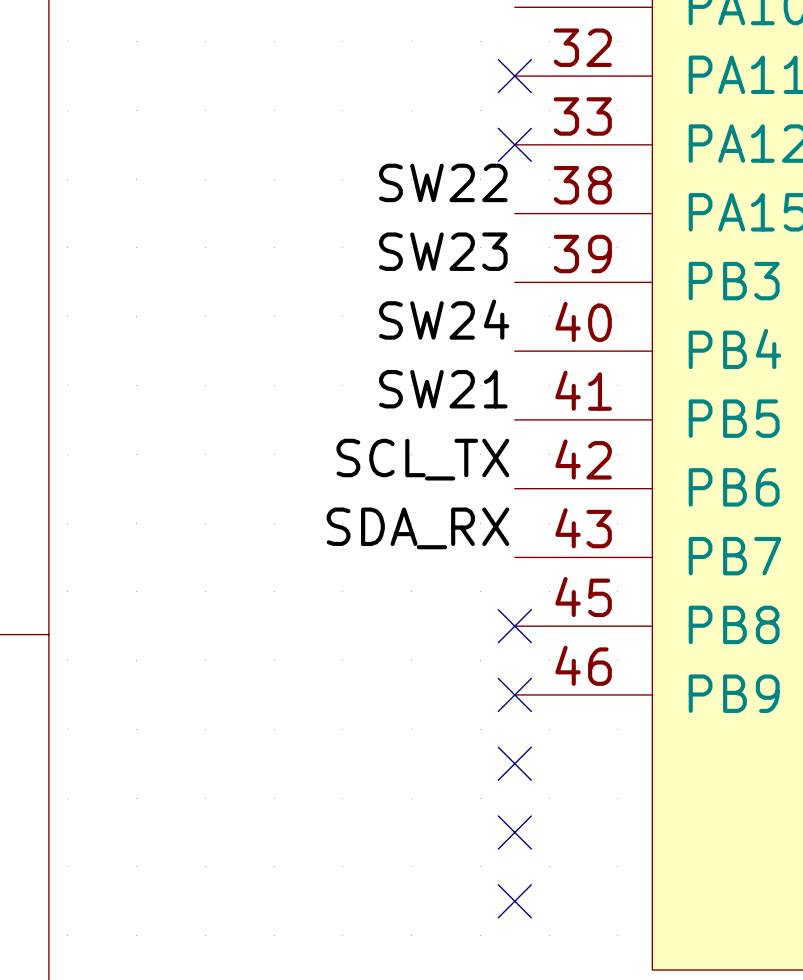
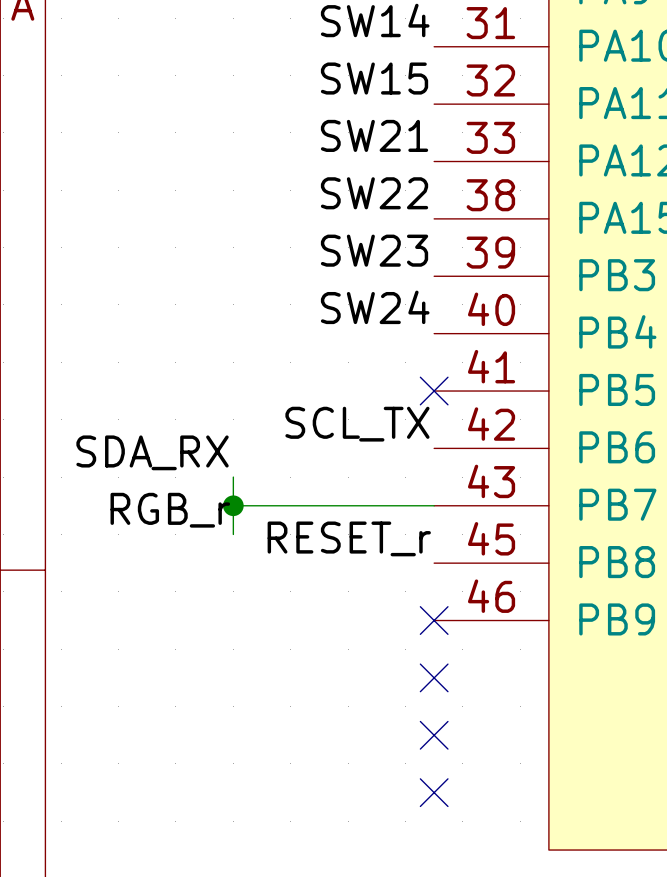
label: none -> SW15 (374, 78)
no-connect mark: (514, 76) -> none
no-connect mark: (514, 144) -> none
label position: SW21 (443, 389) -> SW21 (374, 135)
no-connect mark: none -> (434, 391)
wire: none -> (233, 477) (233, 534)
label position: SDA_RX (417, 528) -> SDA_RX (152, 452)
wire: none -> (233, 505) (434, 505)
junction: none -> (233, 505)
label: none -> RGB_r (170, 510)
label: none -> RESET_r (349, 538)
no-connect mark: (514, 626) -> none

